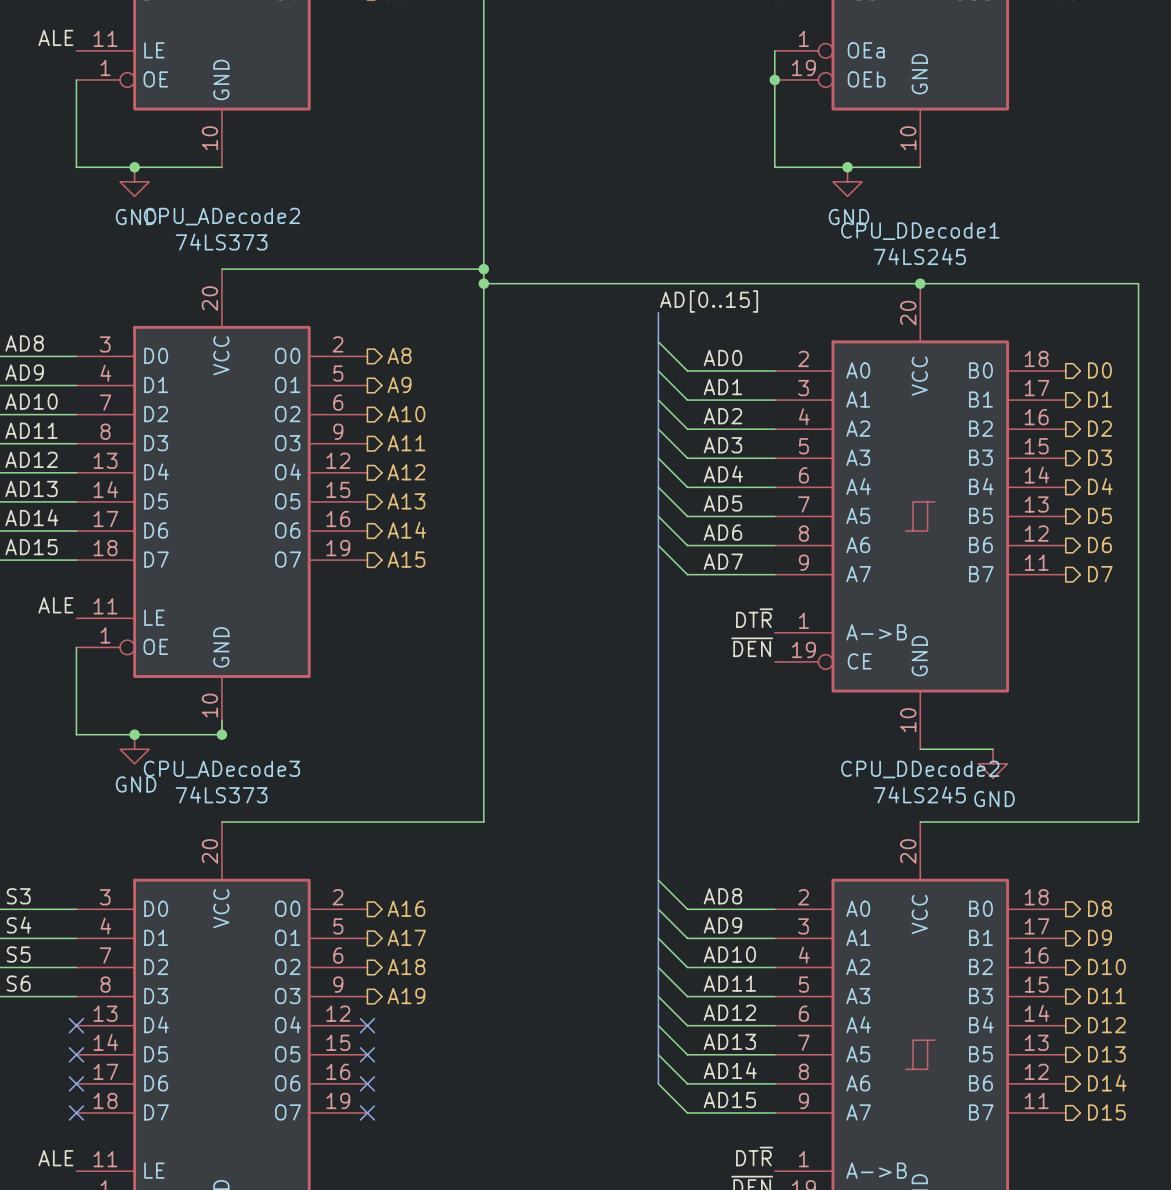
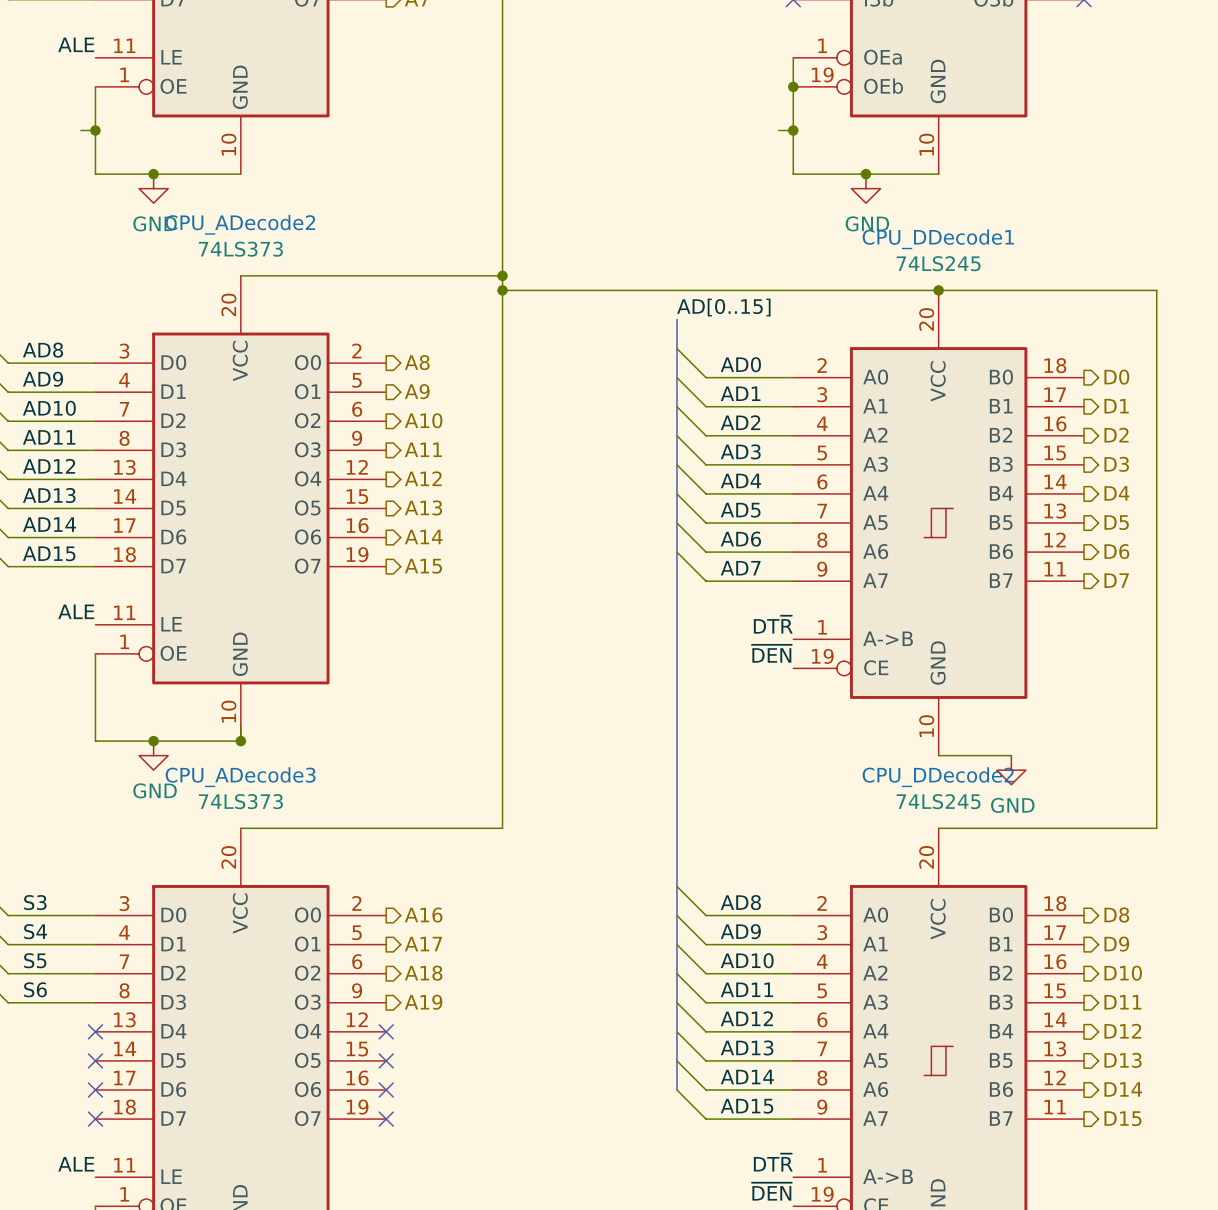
wire: none -> (80, 130) (95, 130)
junction: none -> (95, 130)
wire: none -> (778, 130) (793, 130)
junction: none -> (793, 130)

